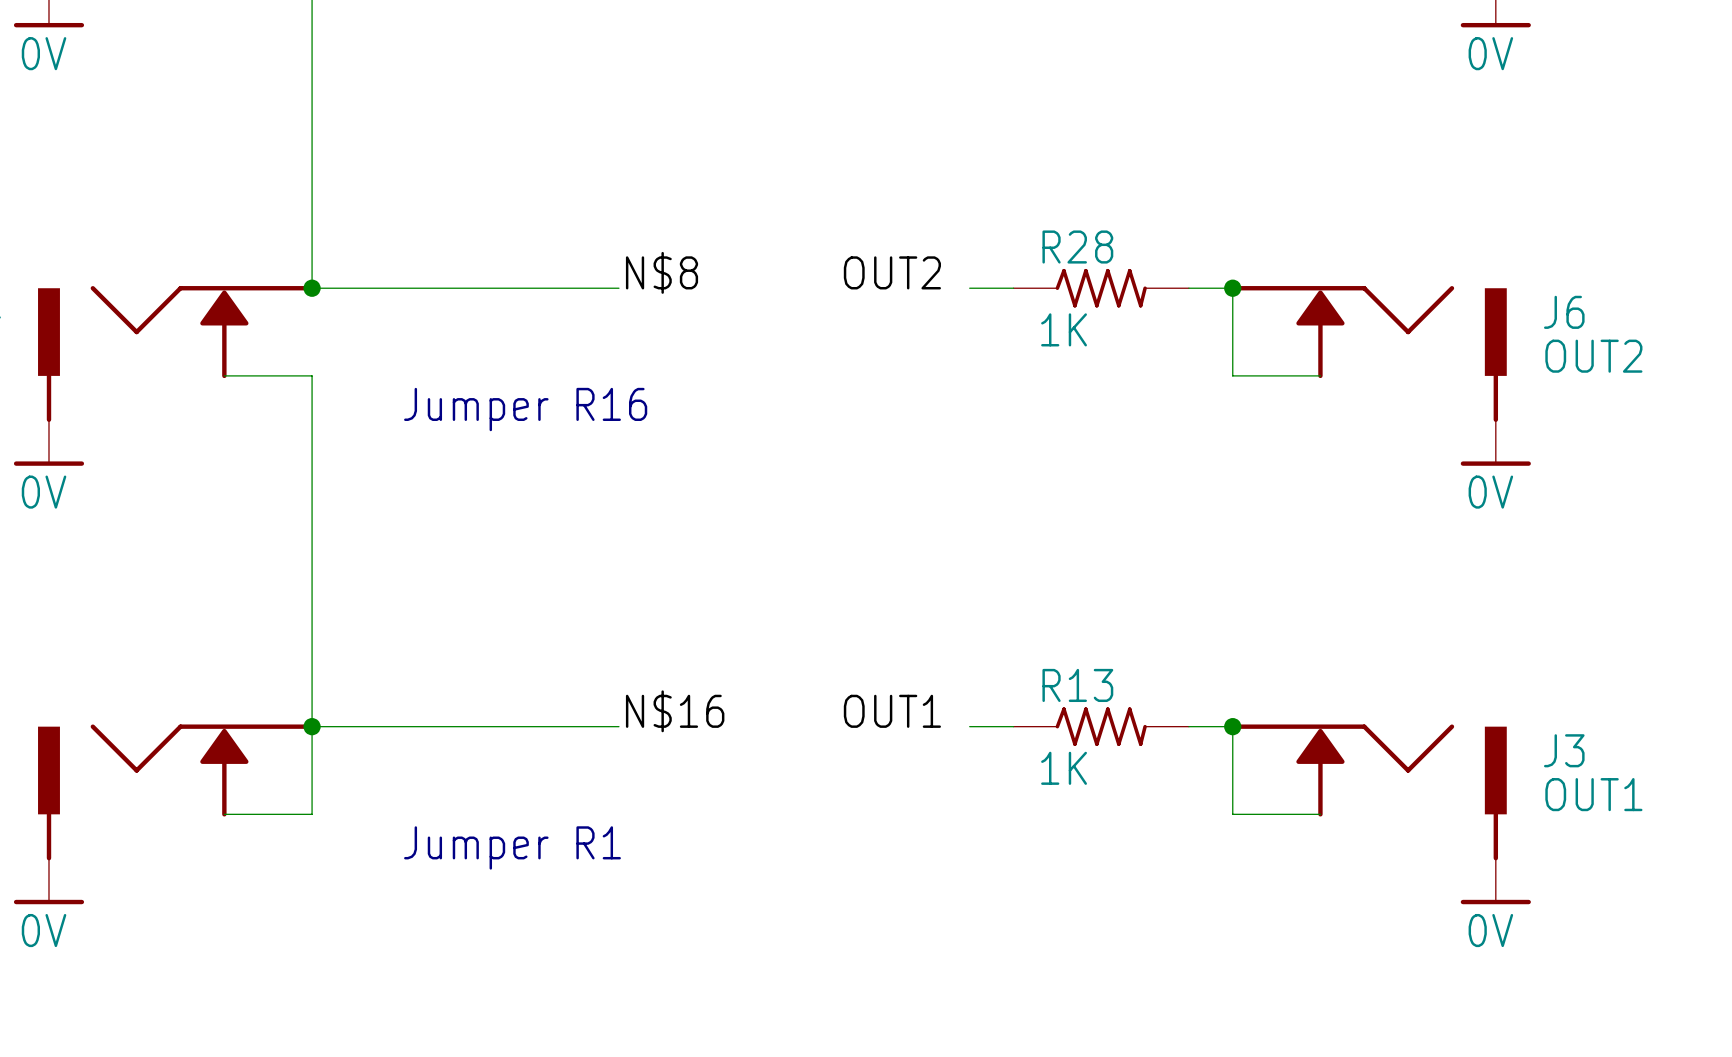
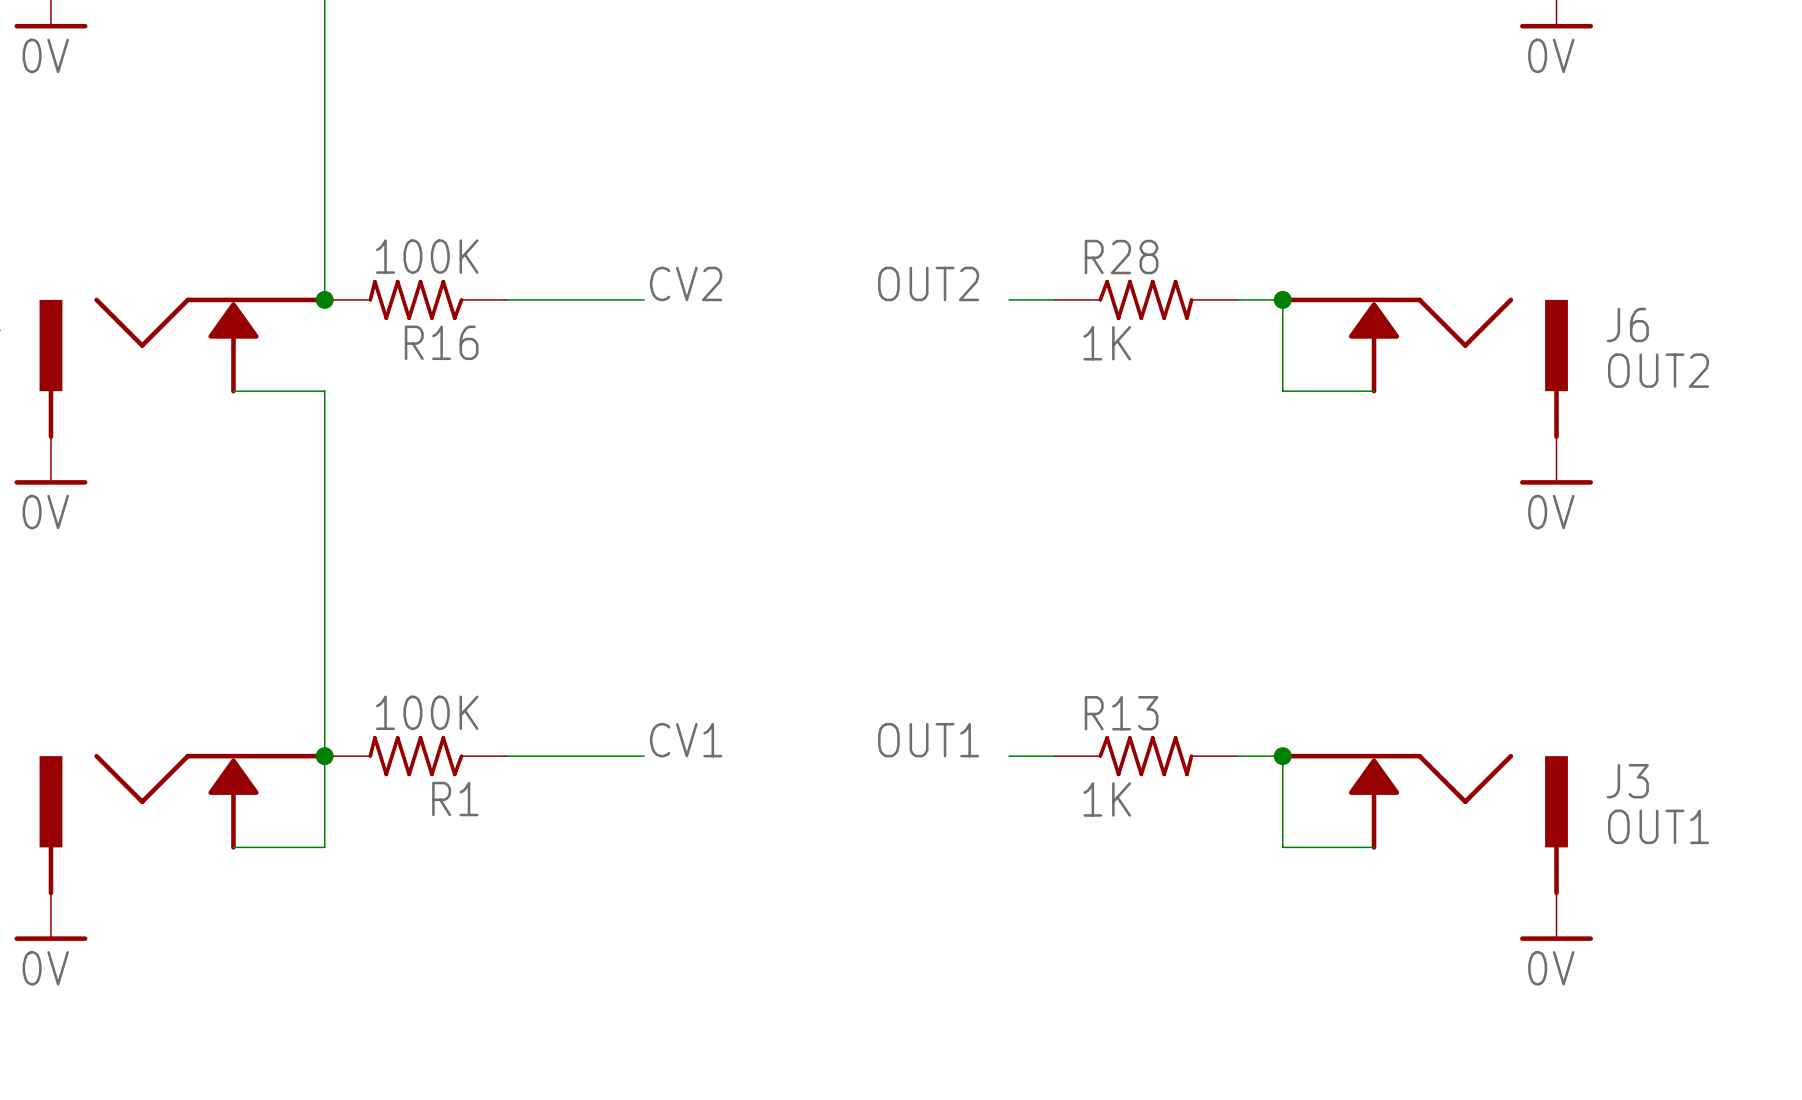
label: N$8 (662, 272) -> CV2 (686, 283)
R16: none -> 100K (415, 299)
text: Jumper R16 (525, 409) -> none
label: N$16 (675, 711) -> CV1 (686, 740)
R1: none -> 100K (415, 756)
text: Jumper R1 (512, 847) -> none

